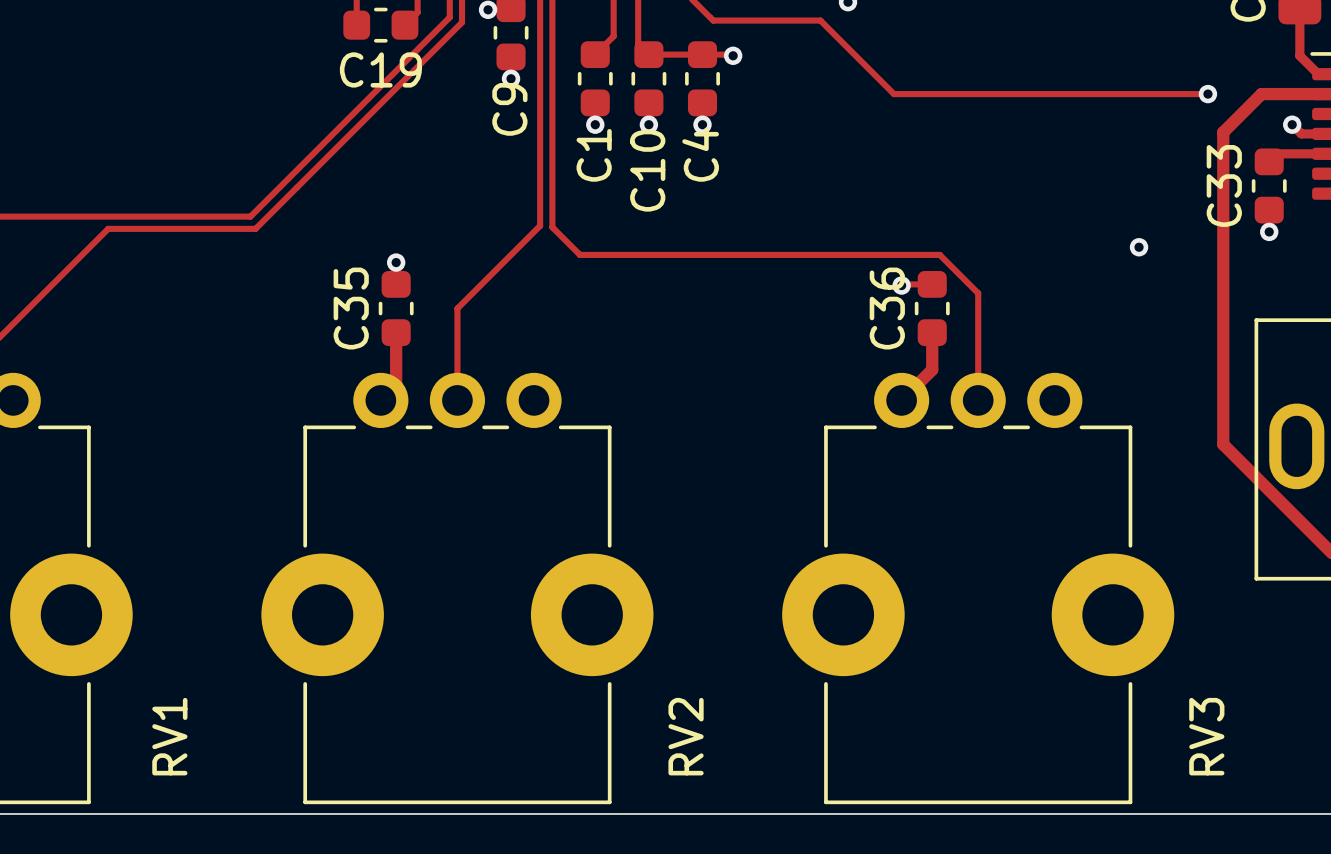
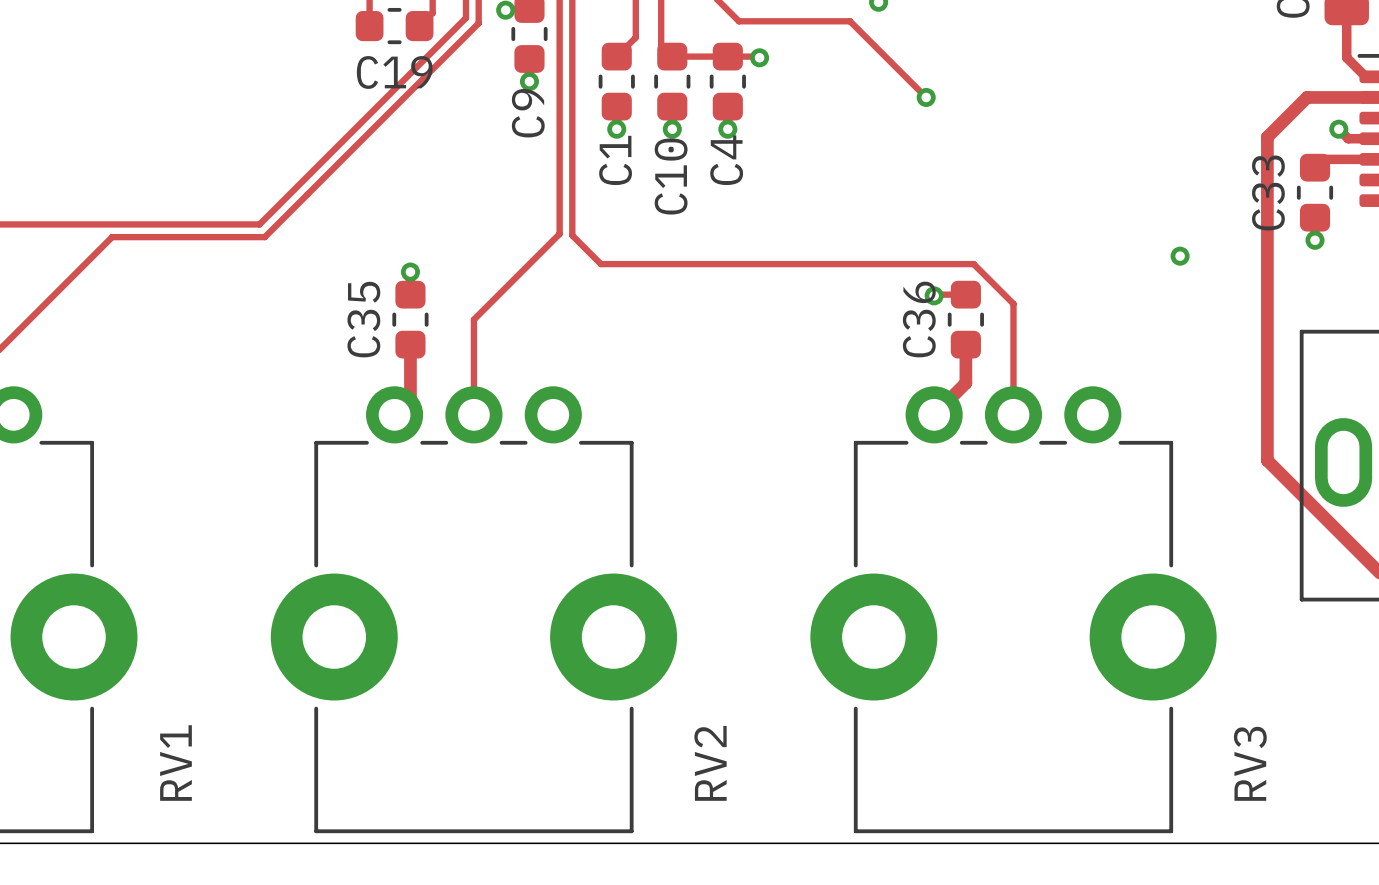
track: (893, 94) (1207, 94) -> none
via: none -> (926, 97)
via: (1207, 94) -> none

